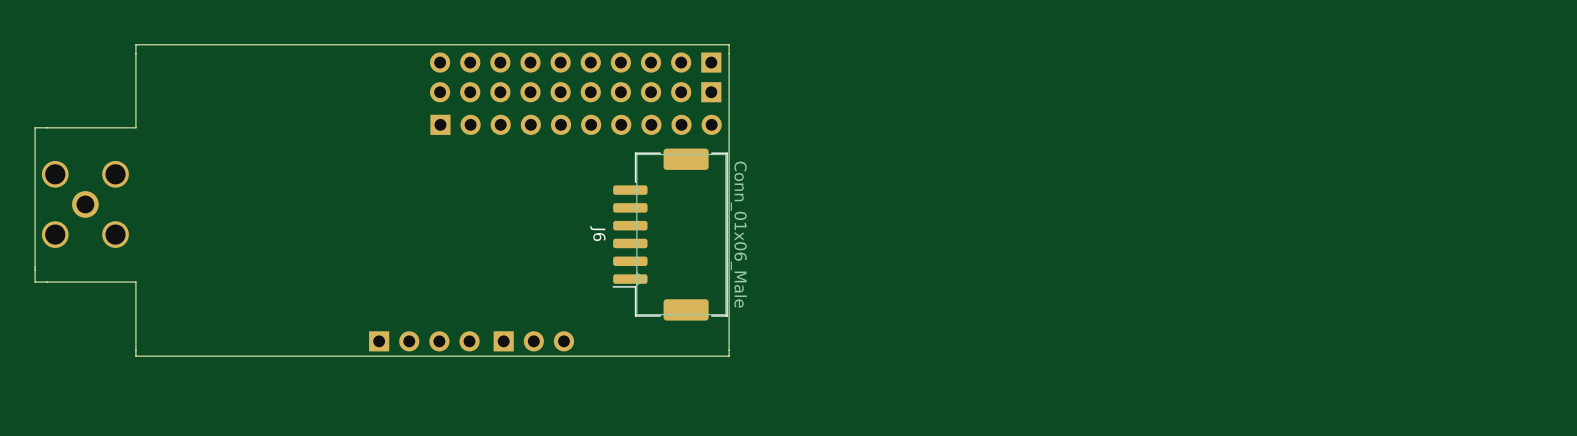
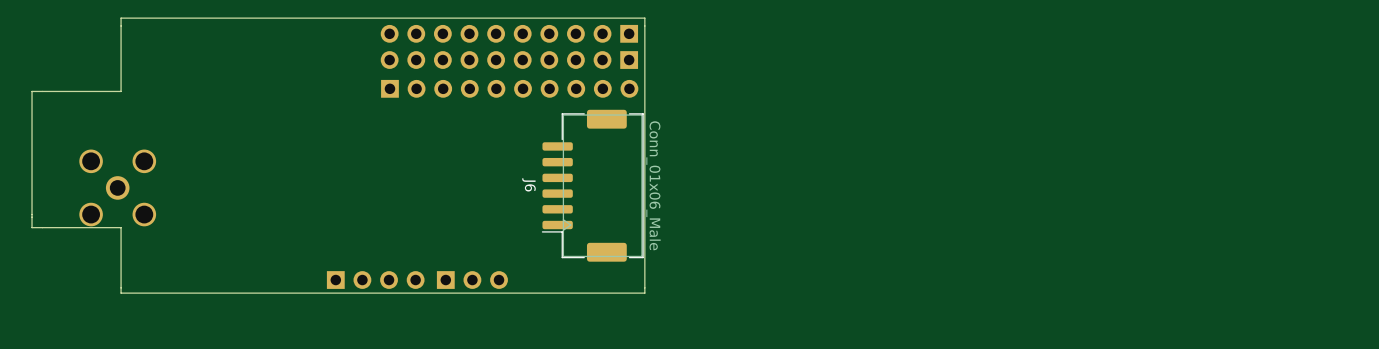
part position: (85, 204) -> (117, 187)

